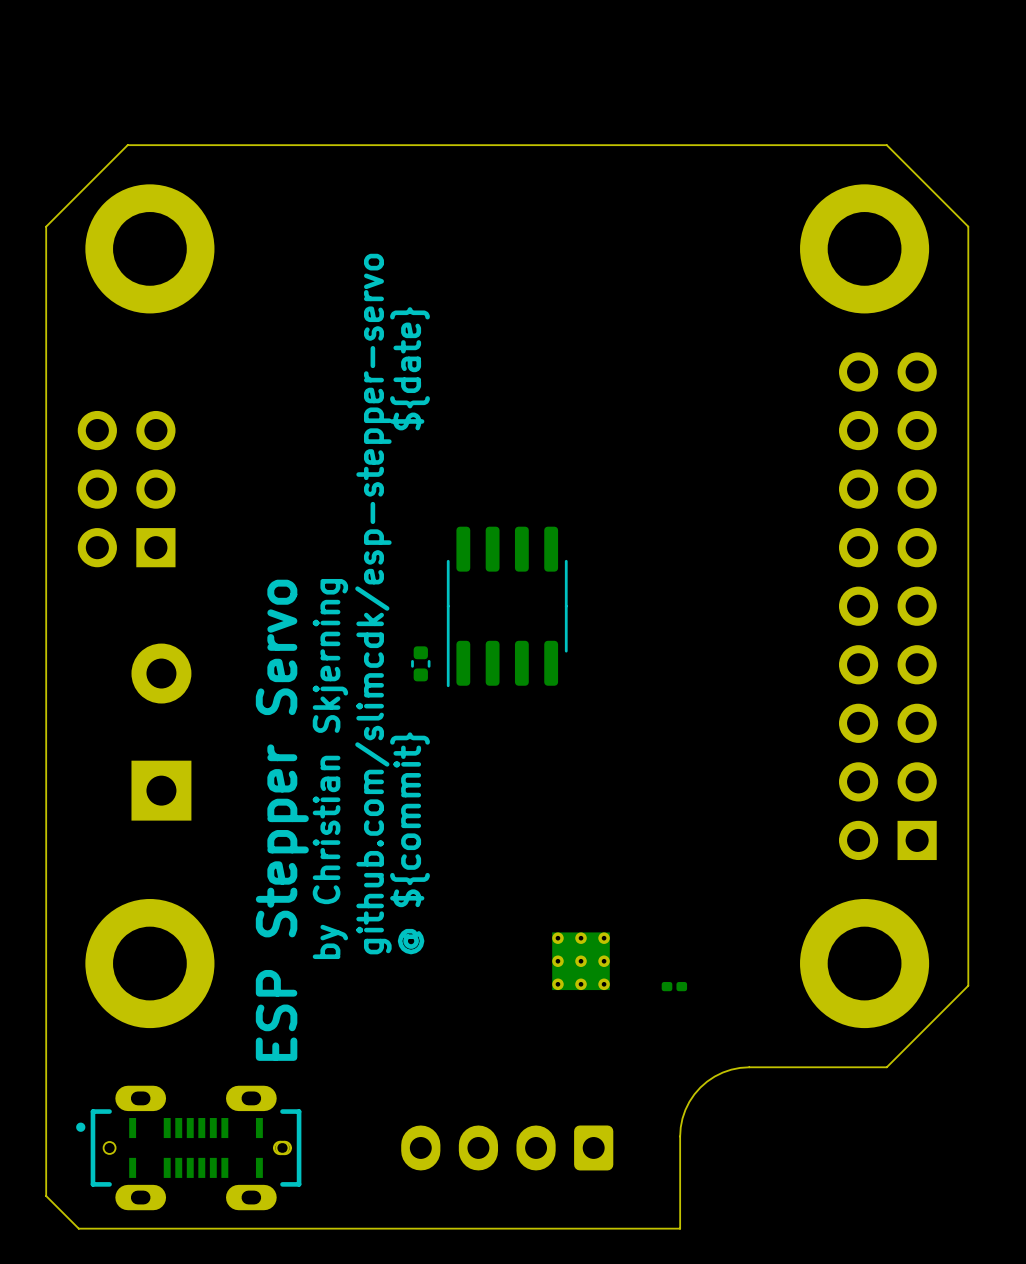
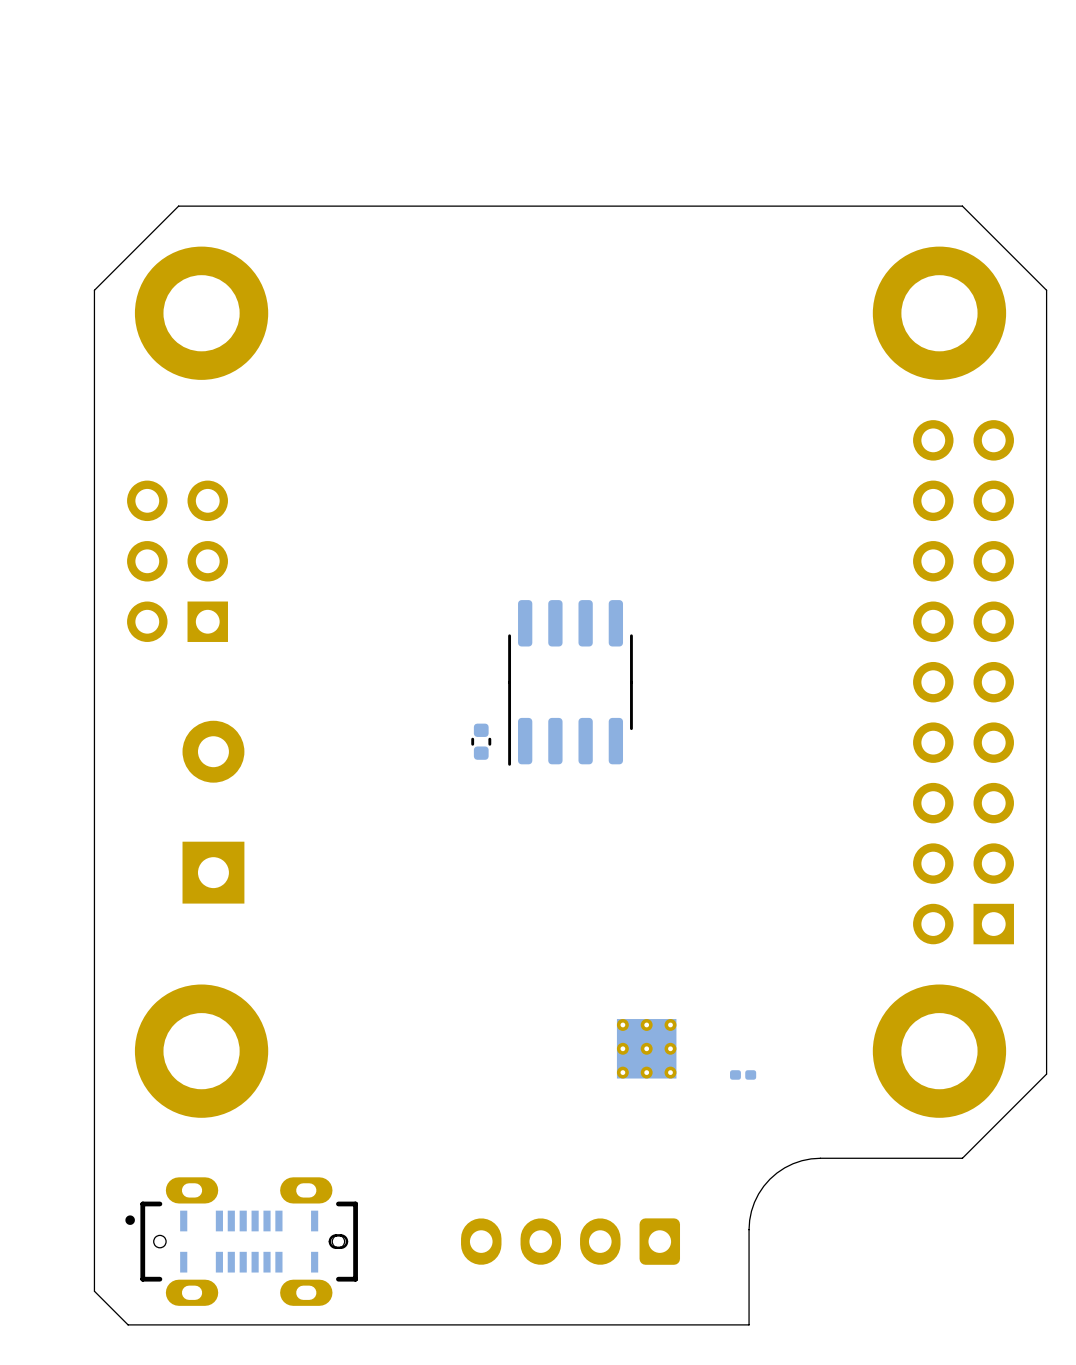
text: ${date} (410, 368) -> none
text: github.com/slimcdk/esp-stepper-servo (373, 604) -> none
text: by Christian Skjerning (330, 769) -> none
text: ESP Stepper Servo (282, 820) -> none
text: @ ${commit} (410, 843) -> none

